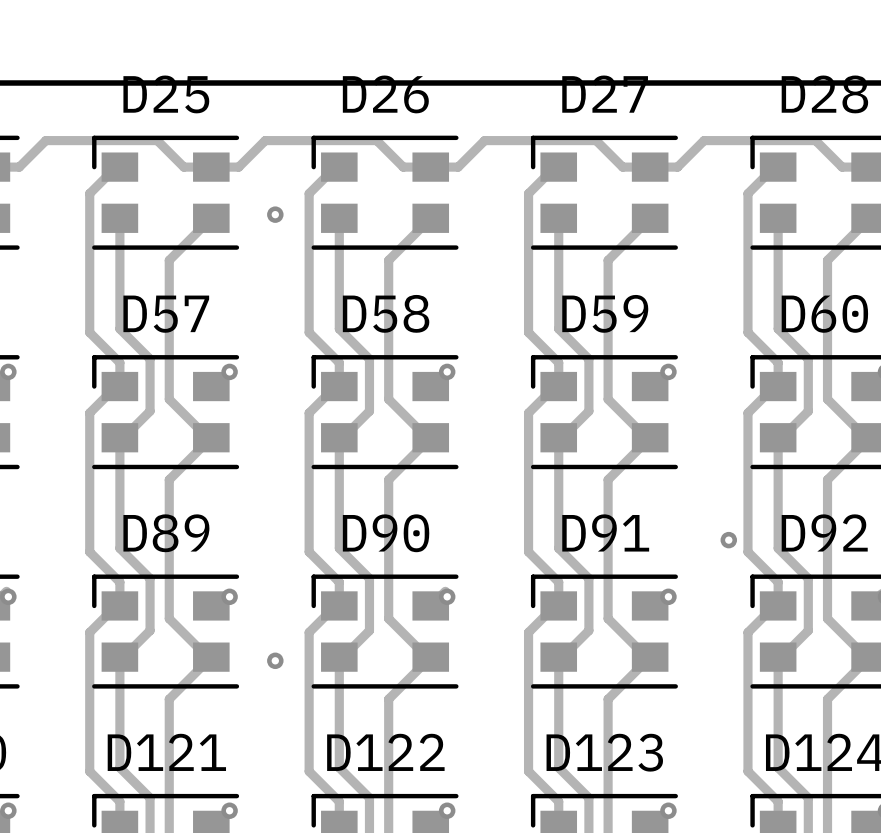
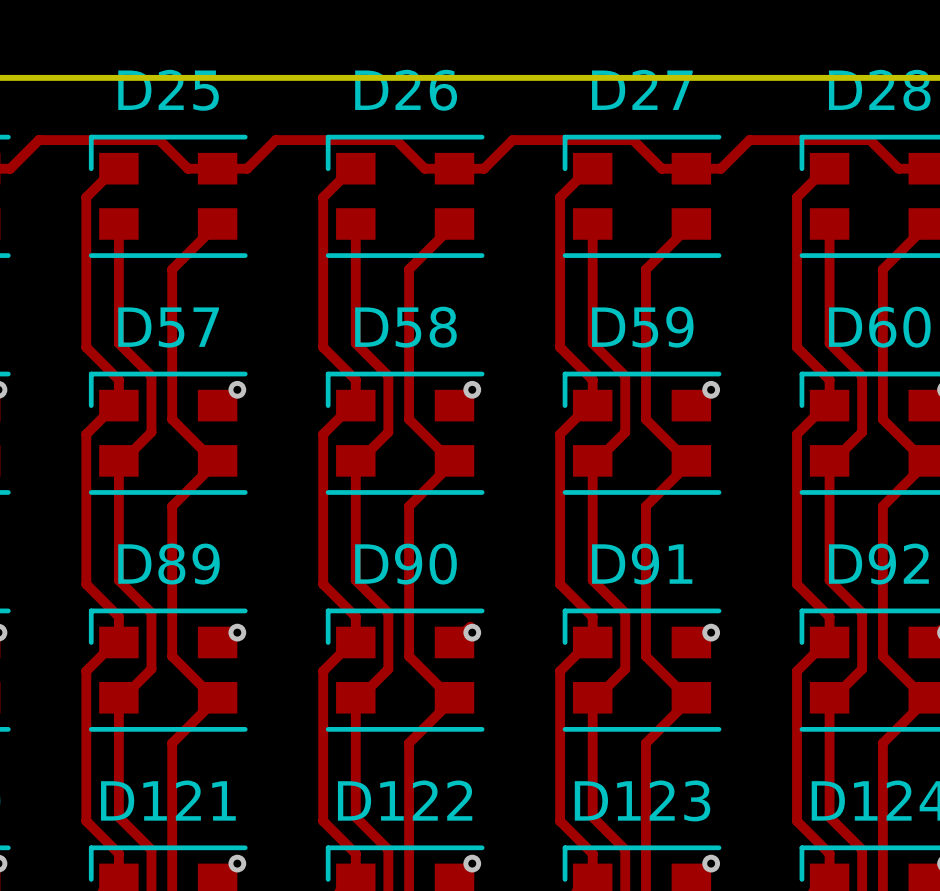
via: (275, 214) -> none
via: (728, 540) -> none
via: (275, 660) -> none

